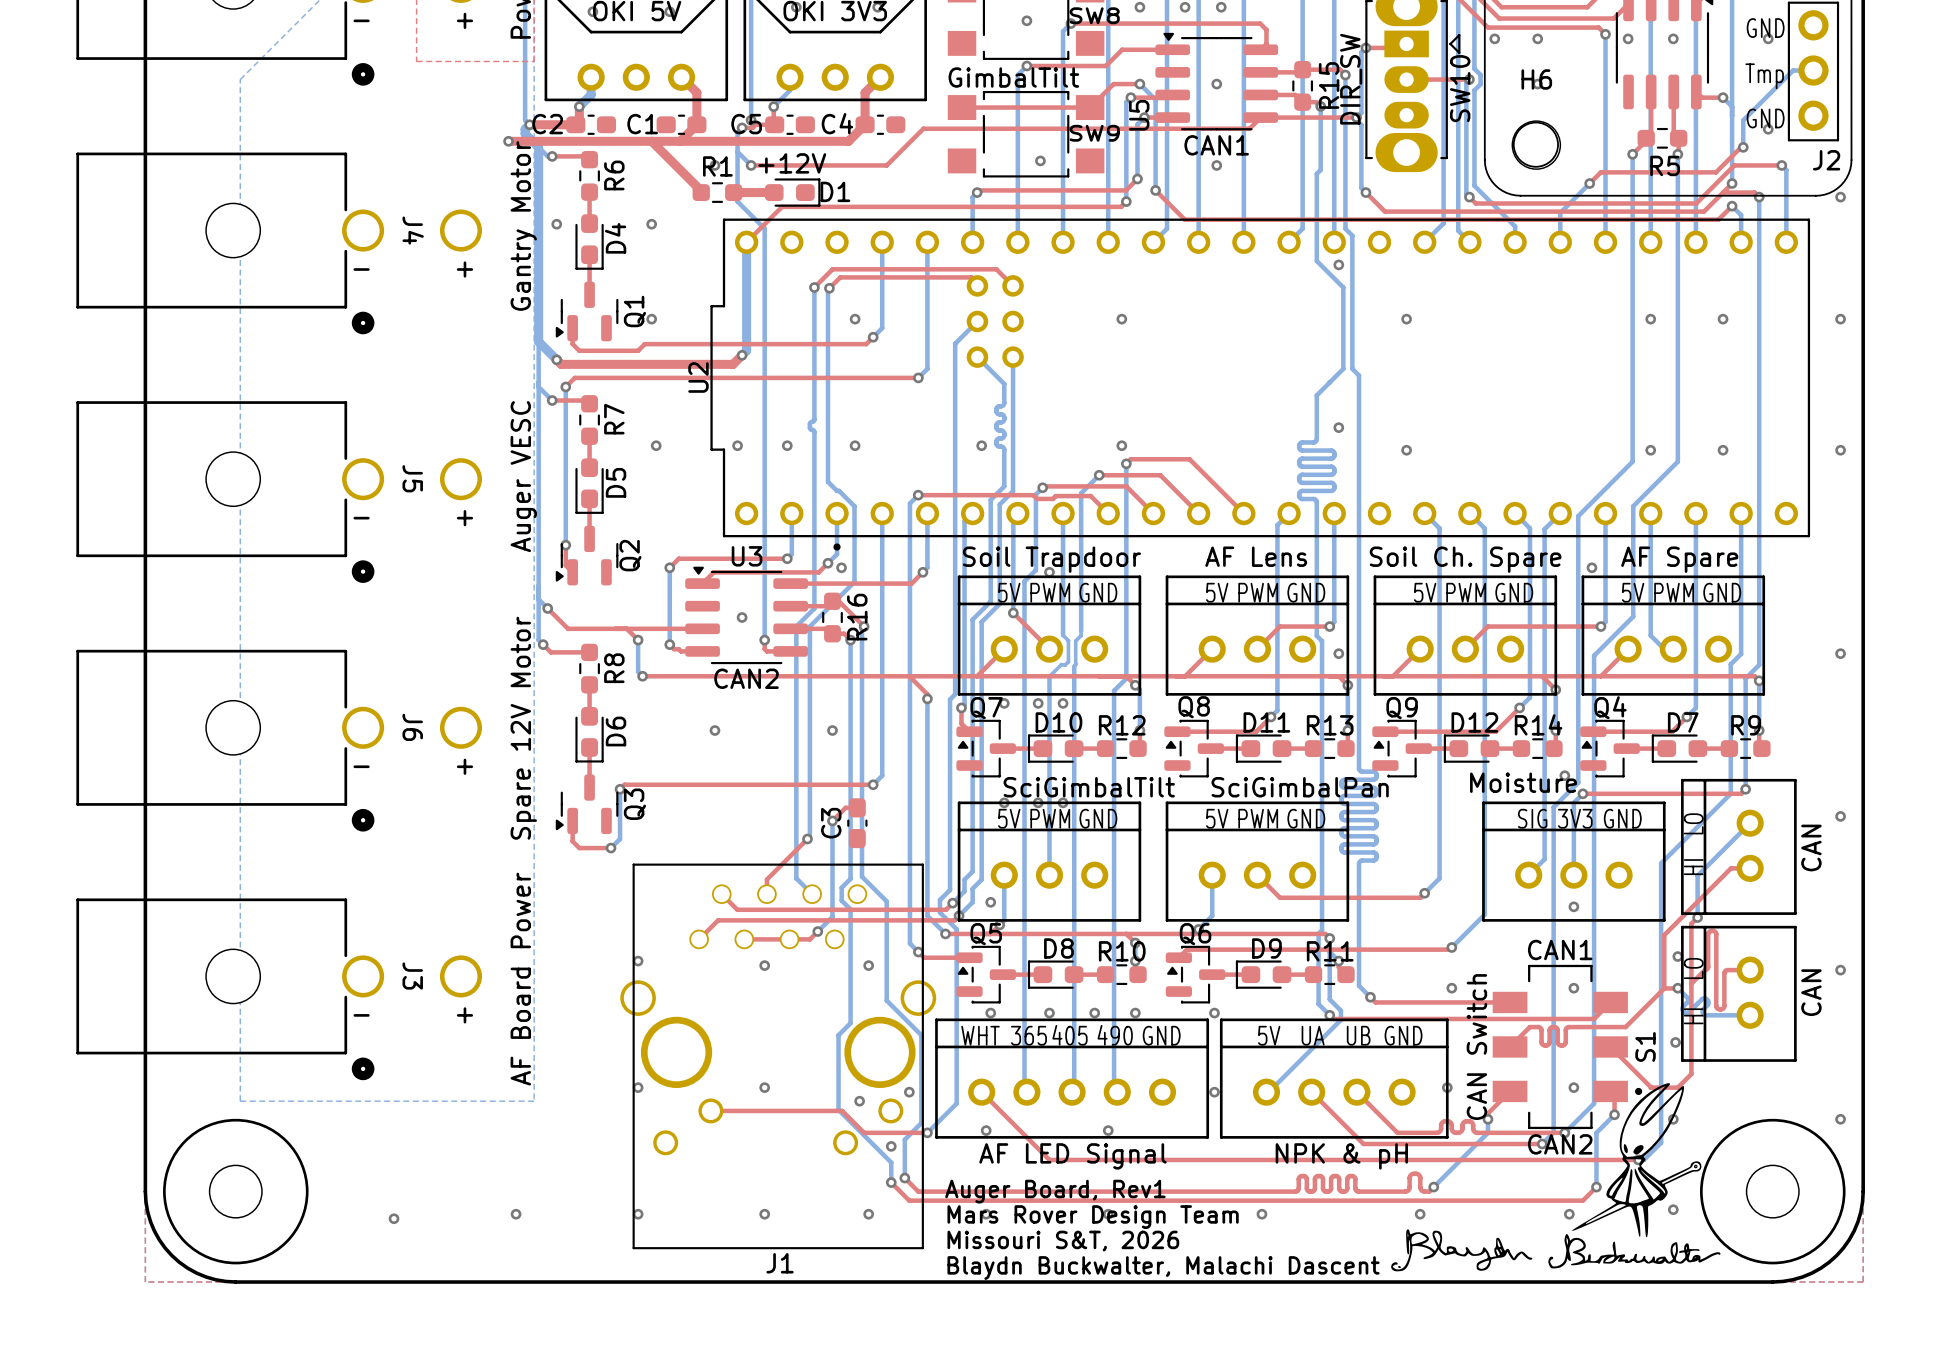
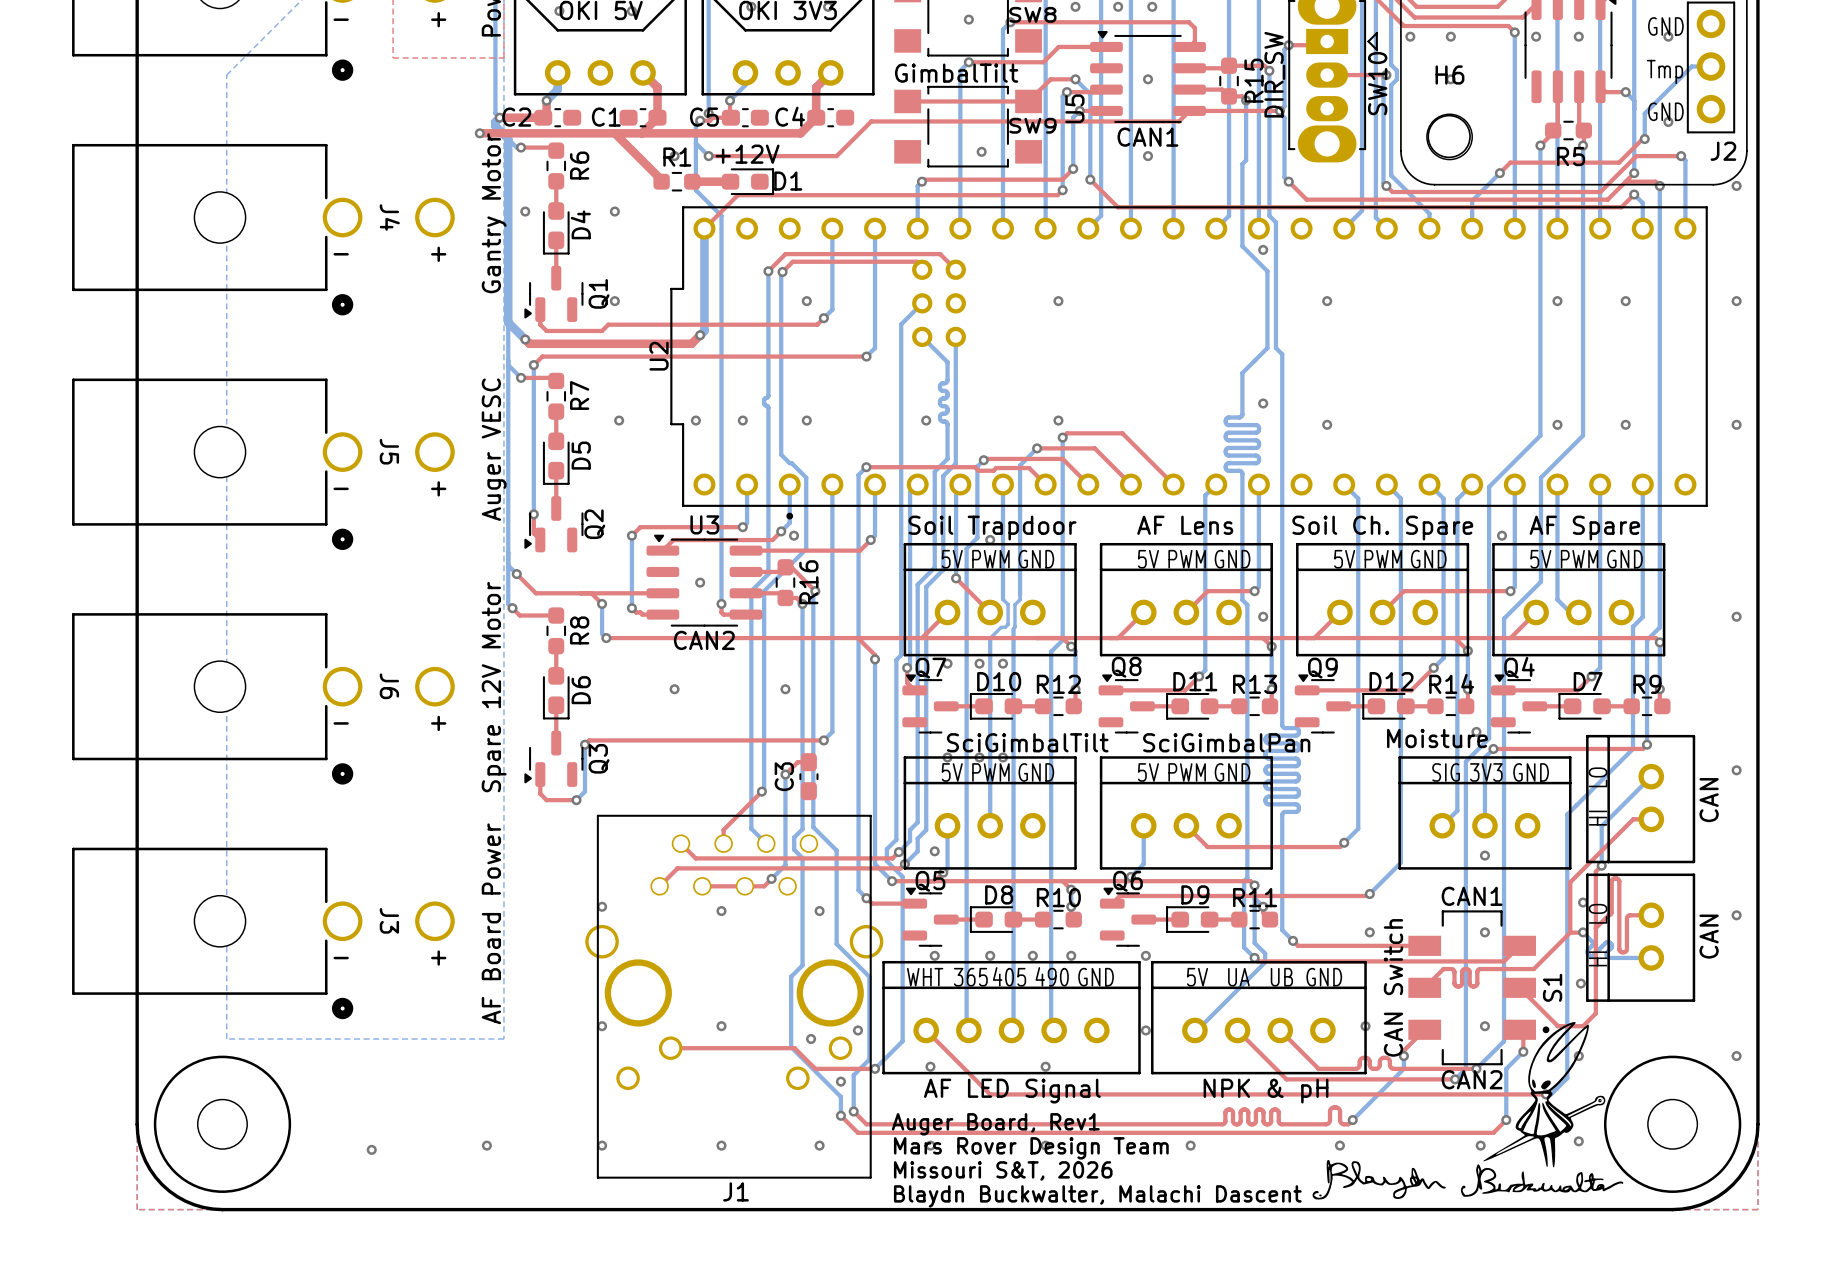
Q7 footprint: [956, 719, 1017, 778] -> [902, 674, 959, 734]
Q8 footprint: [1164, 719, 1224, 778] -> [1098, 674, 1155, 734]
Q9 footprint: [1372, 719, 1432, 778] -> [1294, 674, 1352, 734]
Q4 footprint: [1580, 719, 1640, 778] -> [1490, 674, 1548, 734]
Q5 footprint: [956, 945, 1017, 1004] -> [902, 887, 959, 947]
Q6 footprint: [1165, 945, 1226, 1004] -> [1099, 887, 1157, 947]

